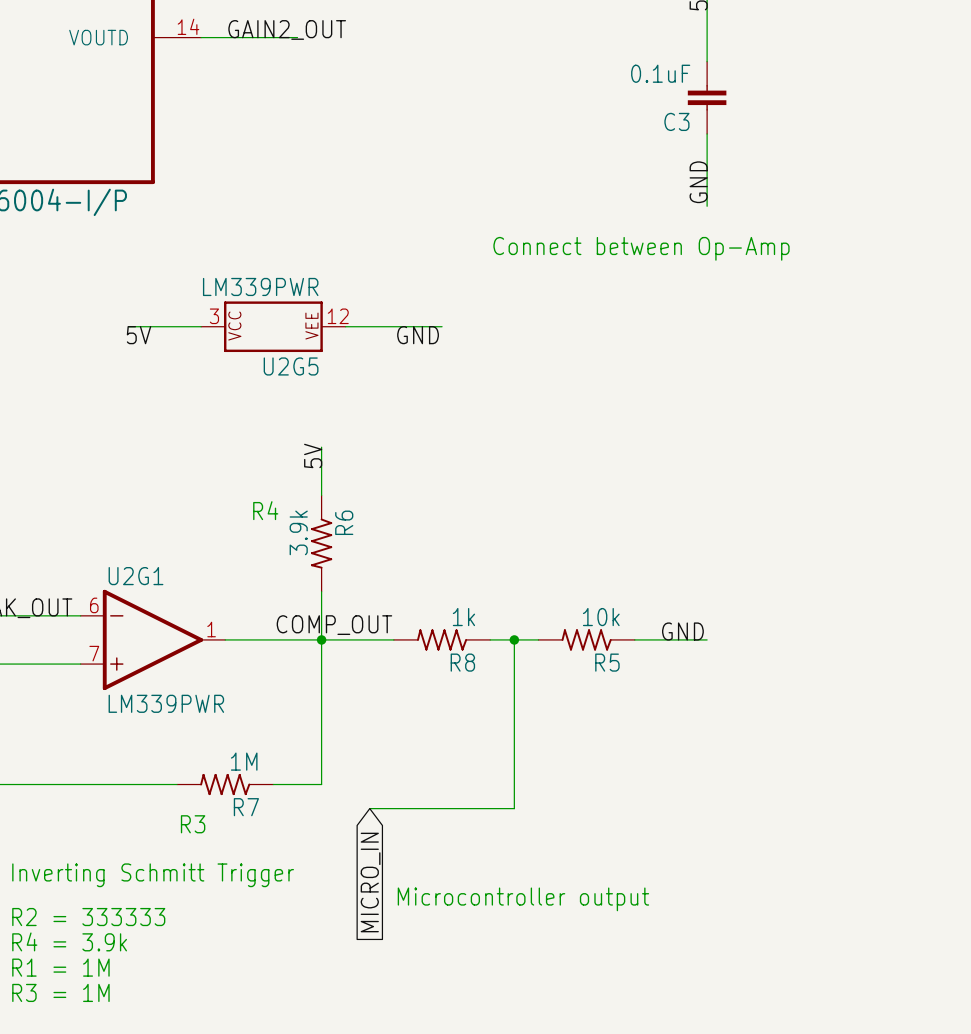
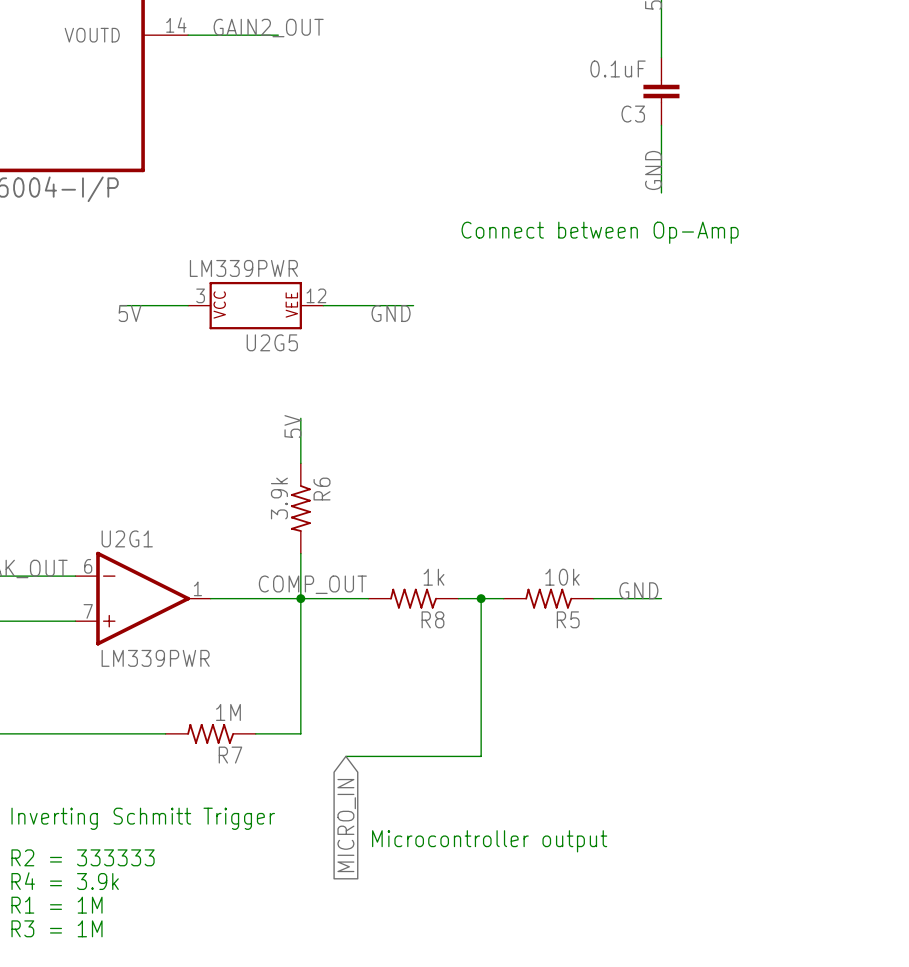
text: R4 (265, 510) -> none
text: R3 (193, 824) -> none

